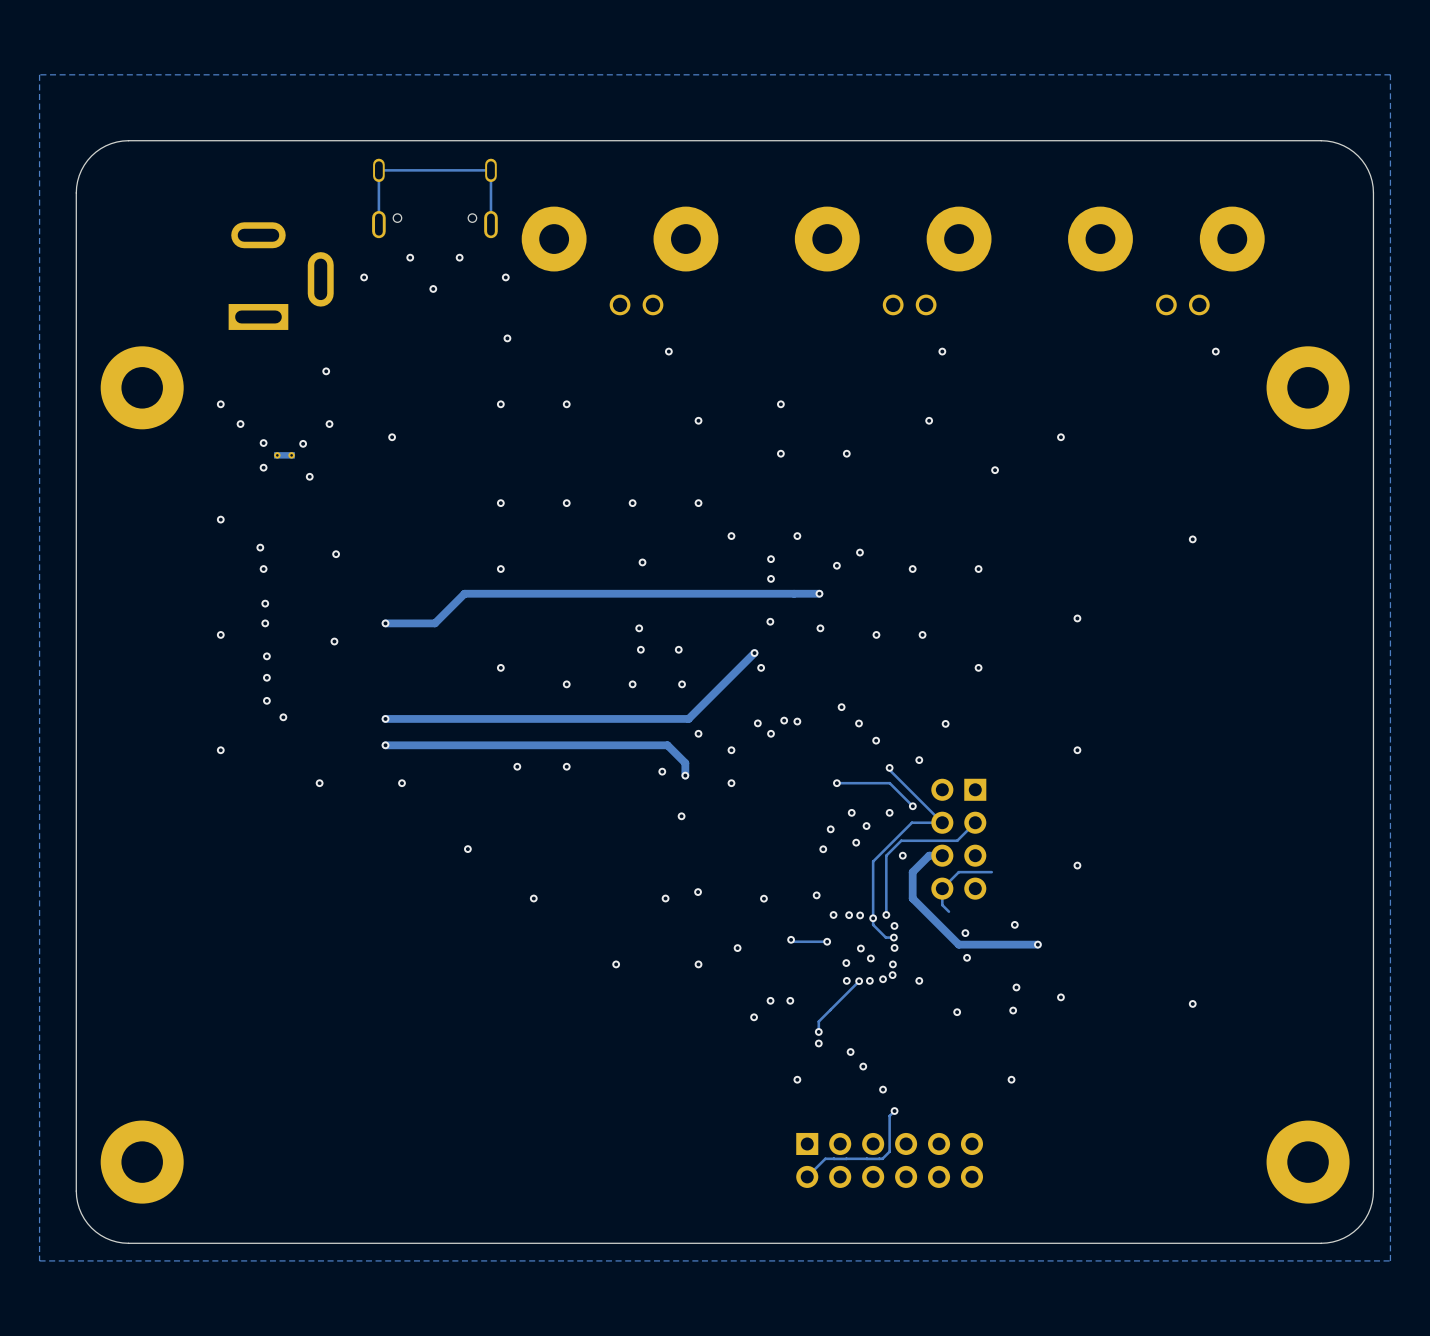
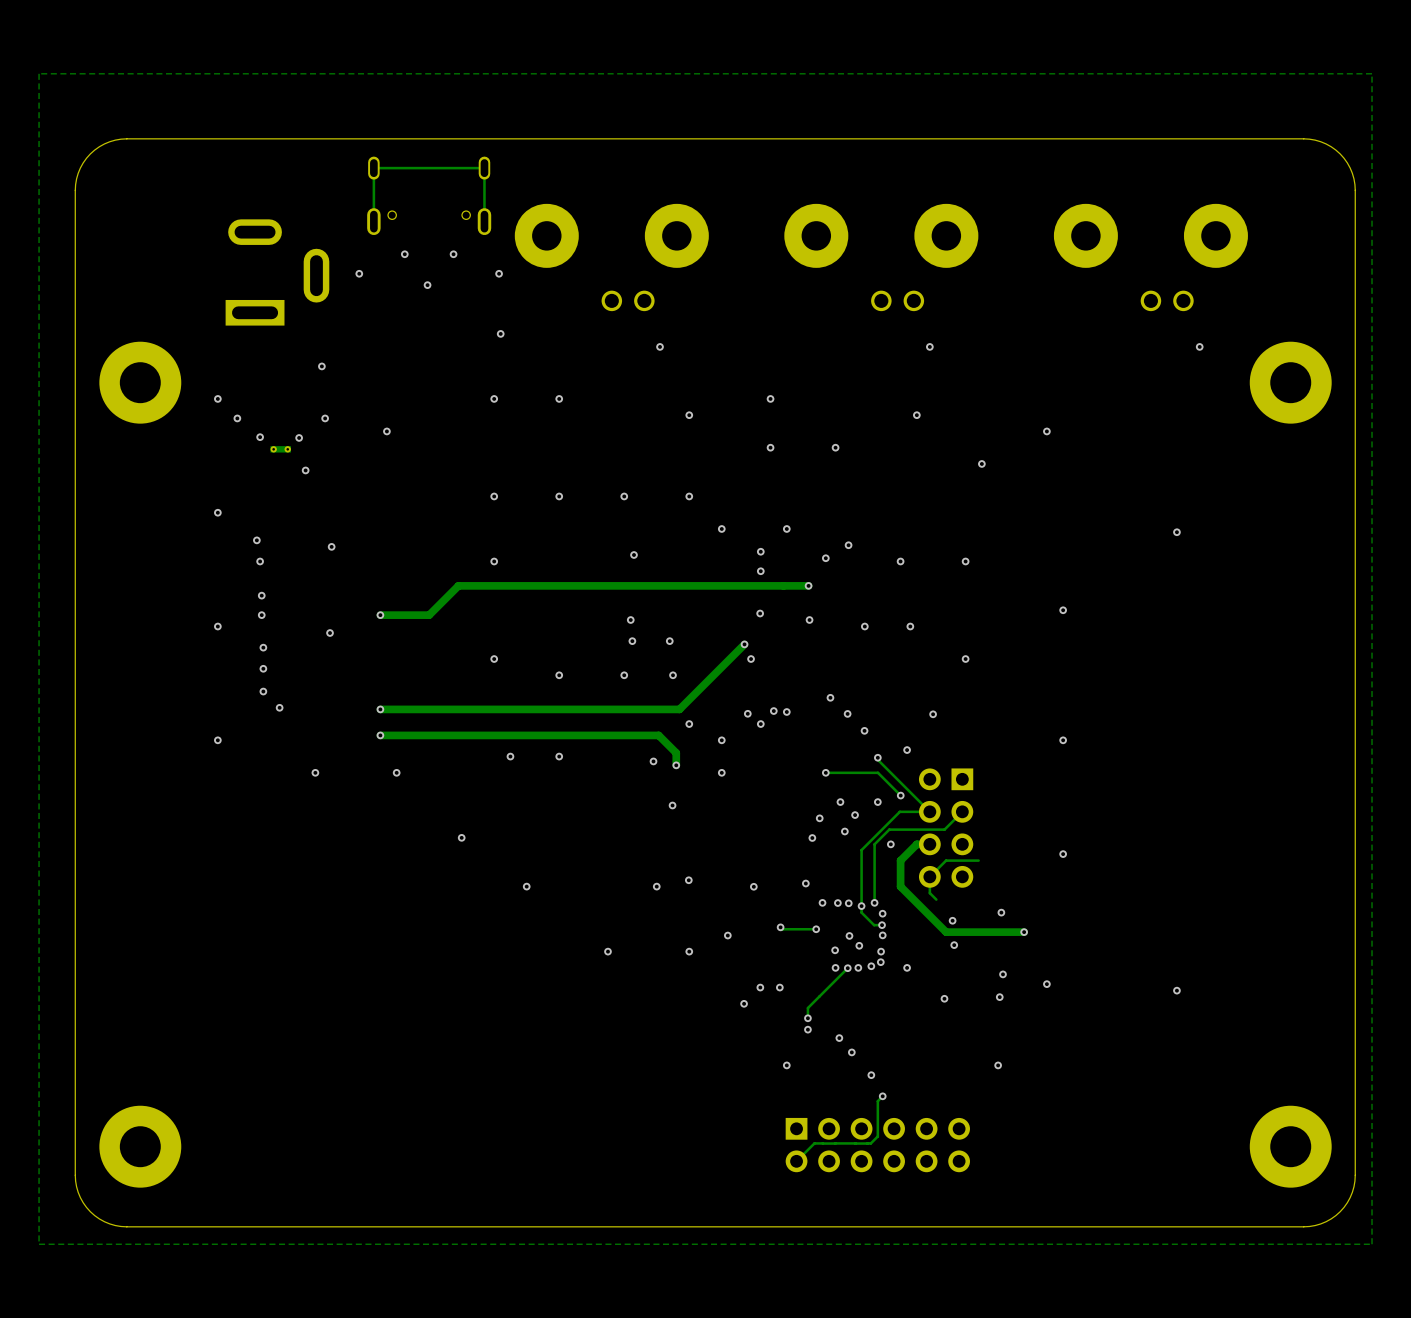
via: (263, 467) -> none

